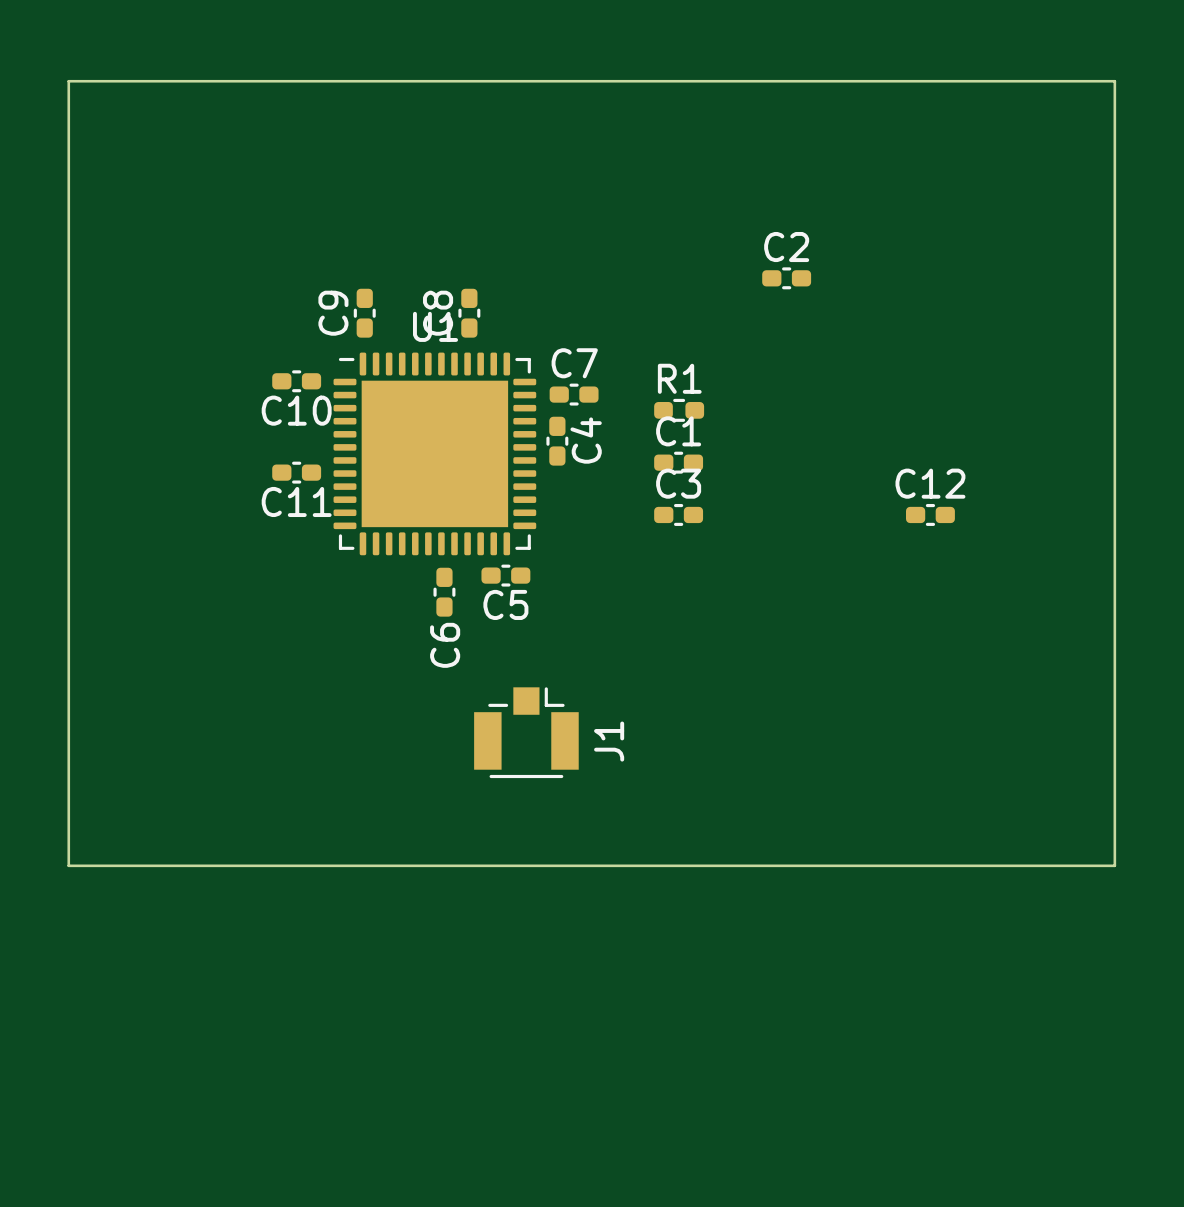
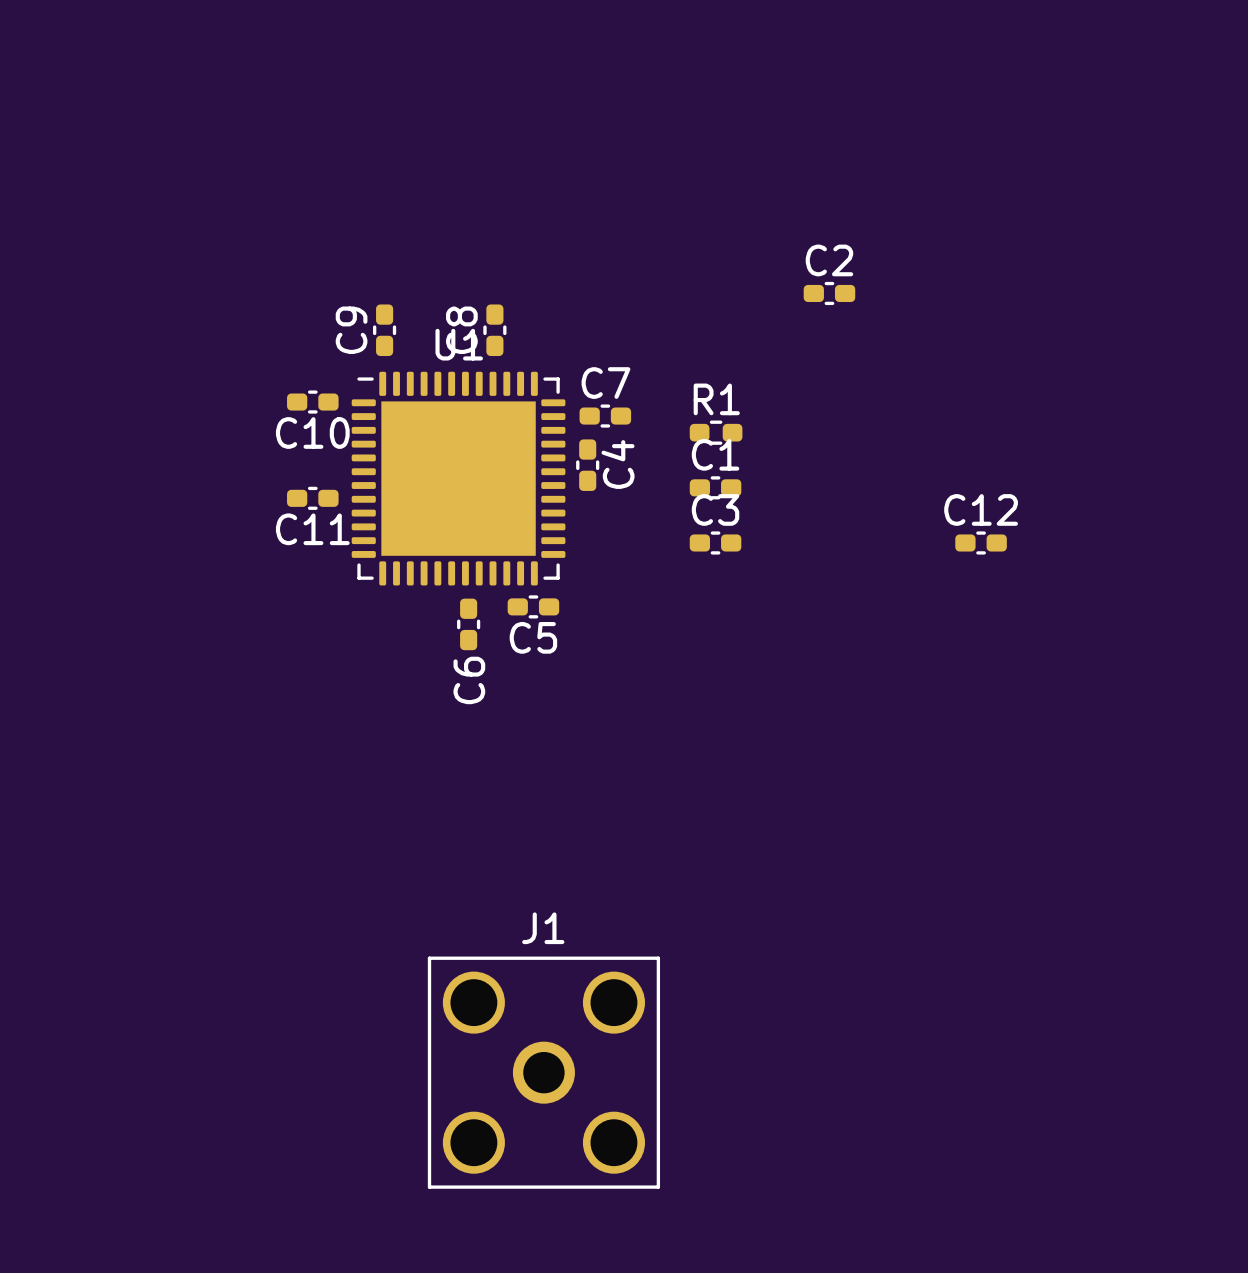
board edge: (68, 81) (1114, 81) (1114, 865) (68, 865) (68, 81) -> none
J1 footprint: [474, 687, 579, 779] -> [427, 956, 661, 1189]
J1 name position: J1 (609, 741) -> J1 (543, 928)

